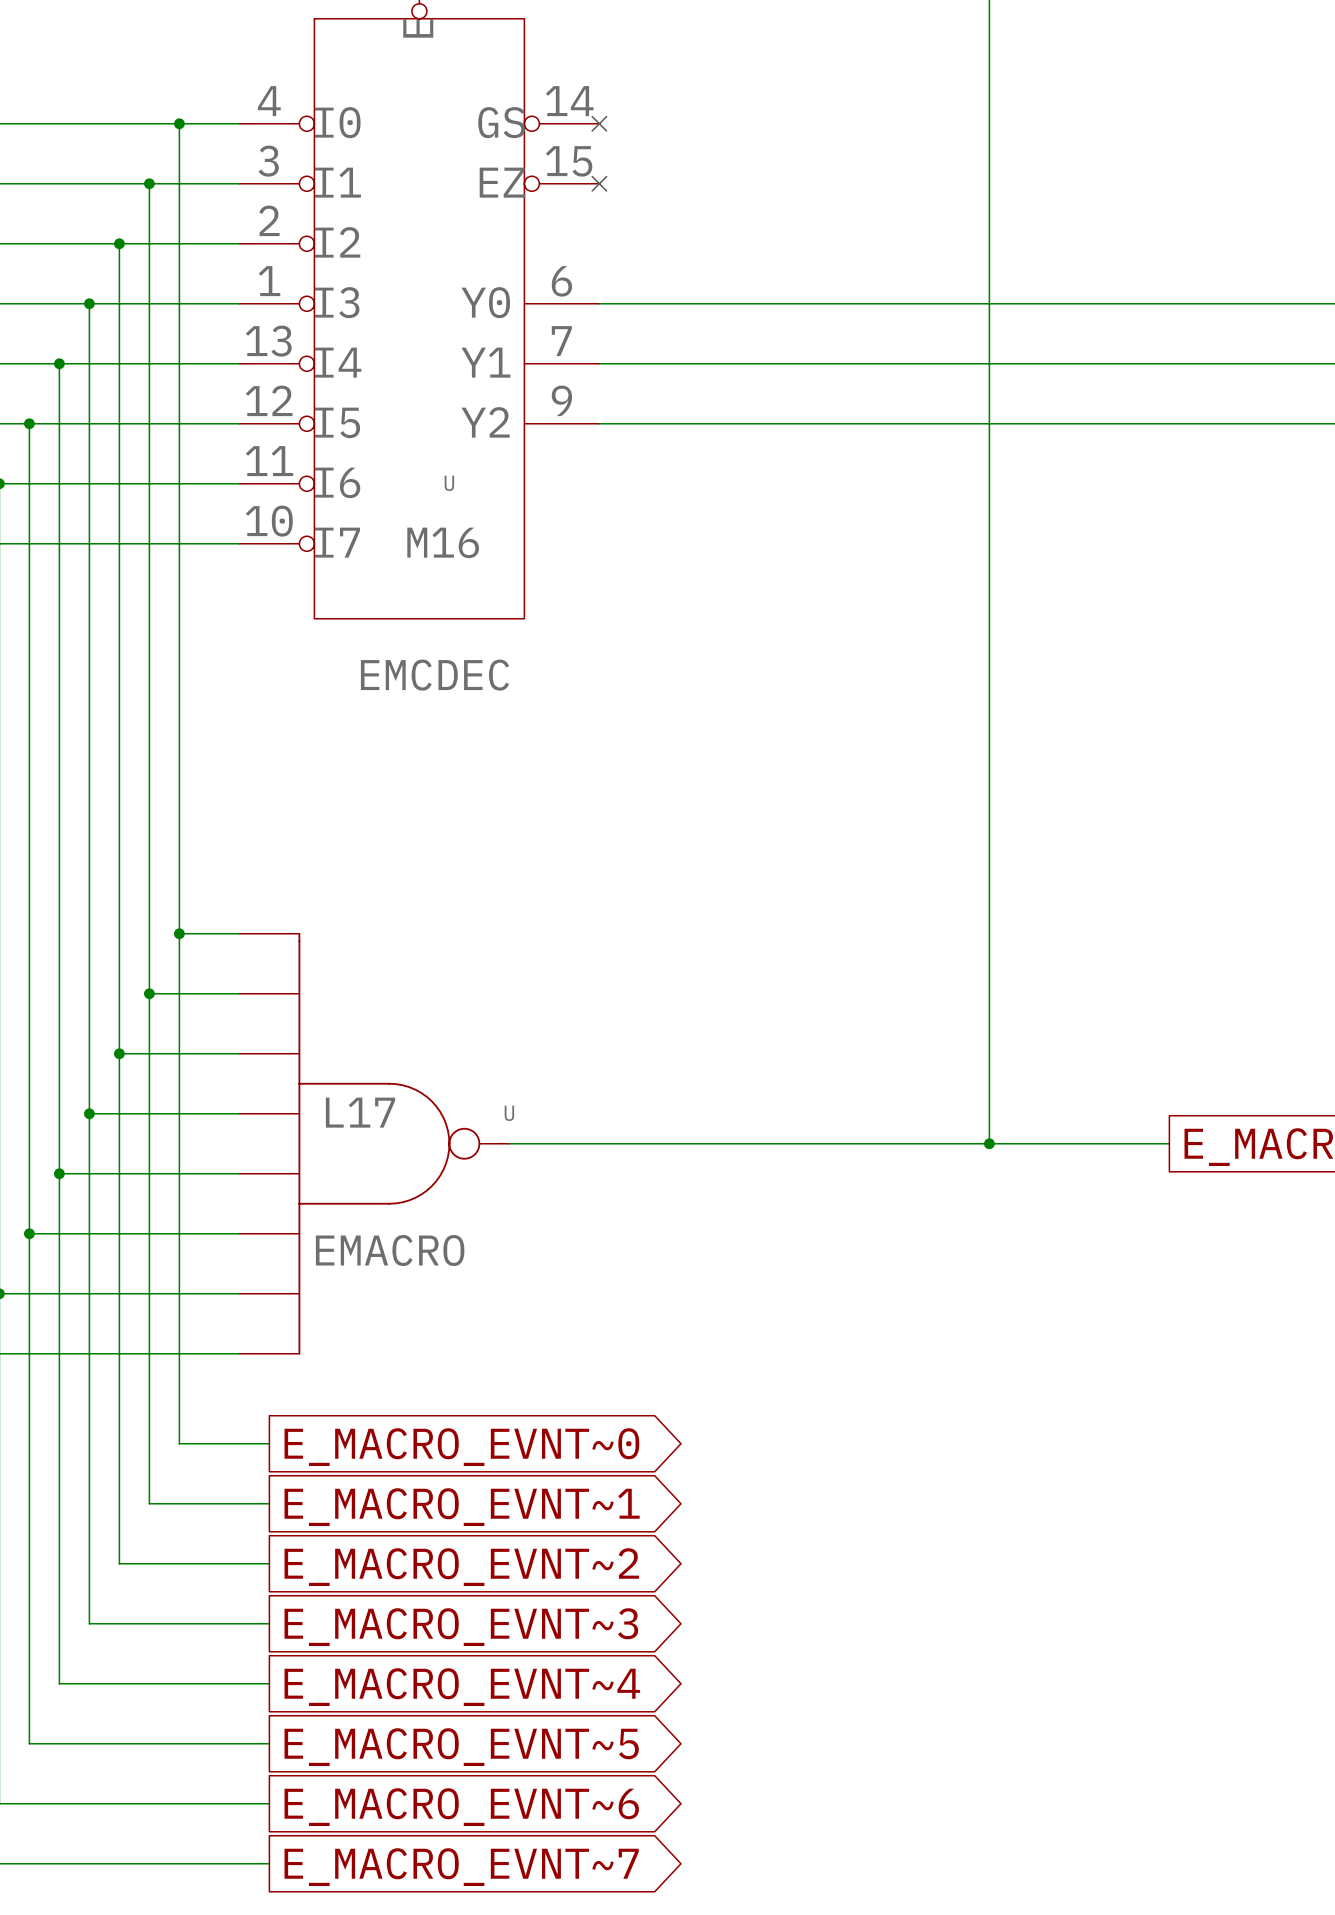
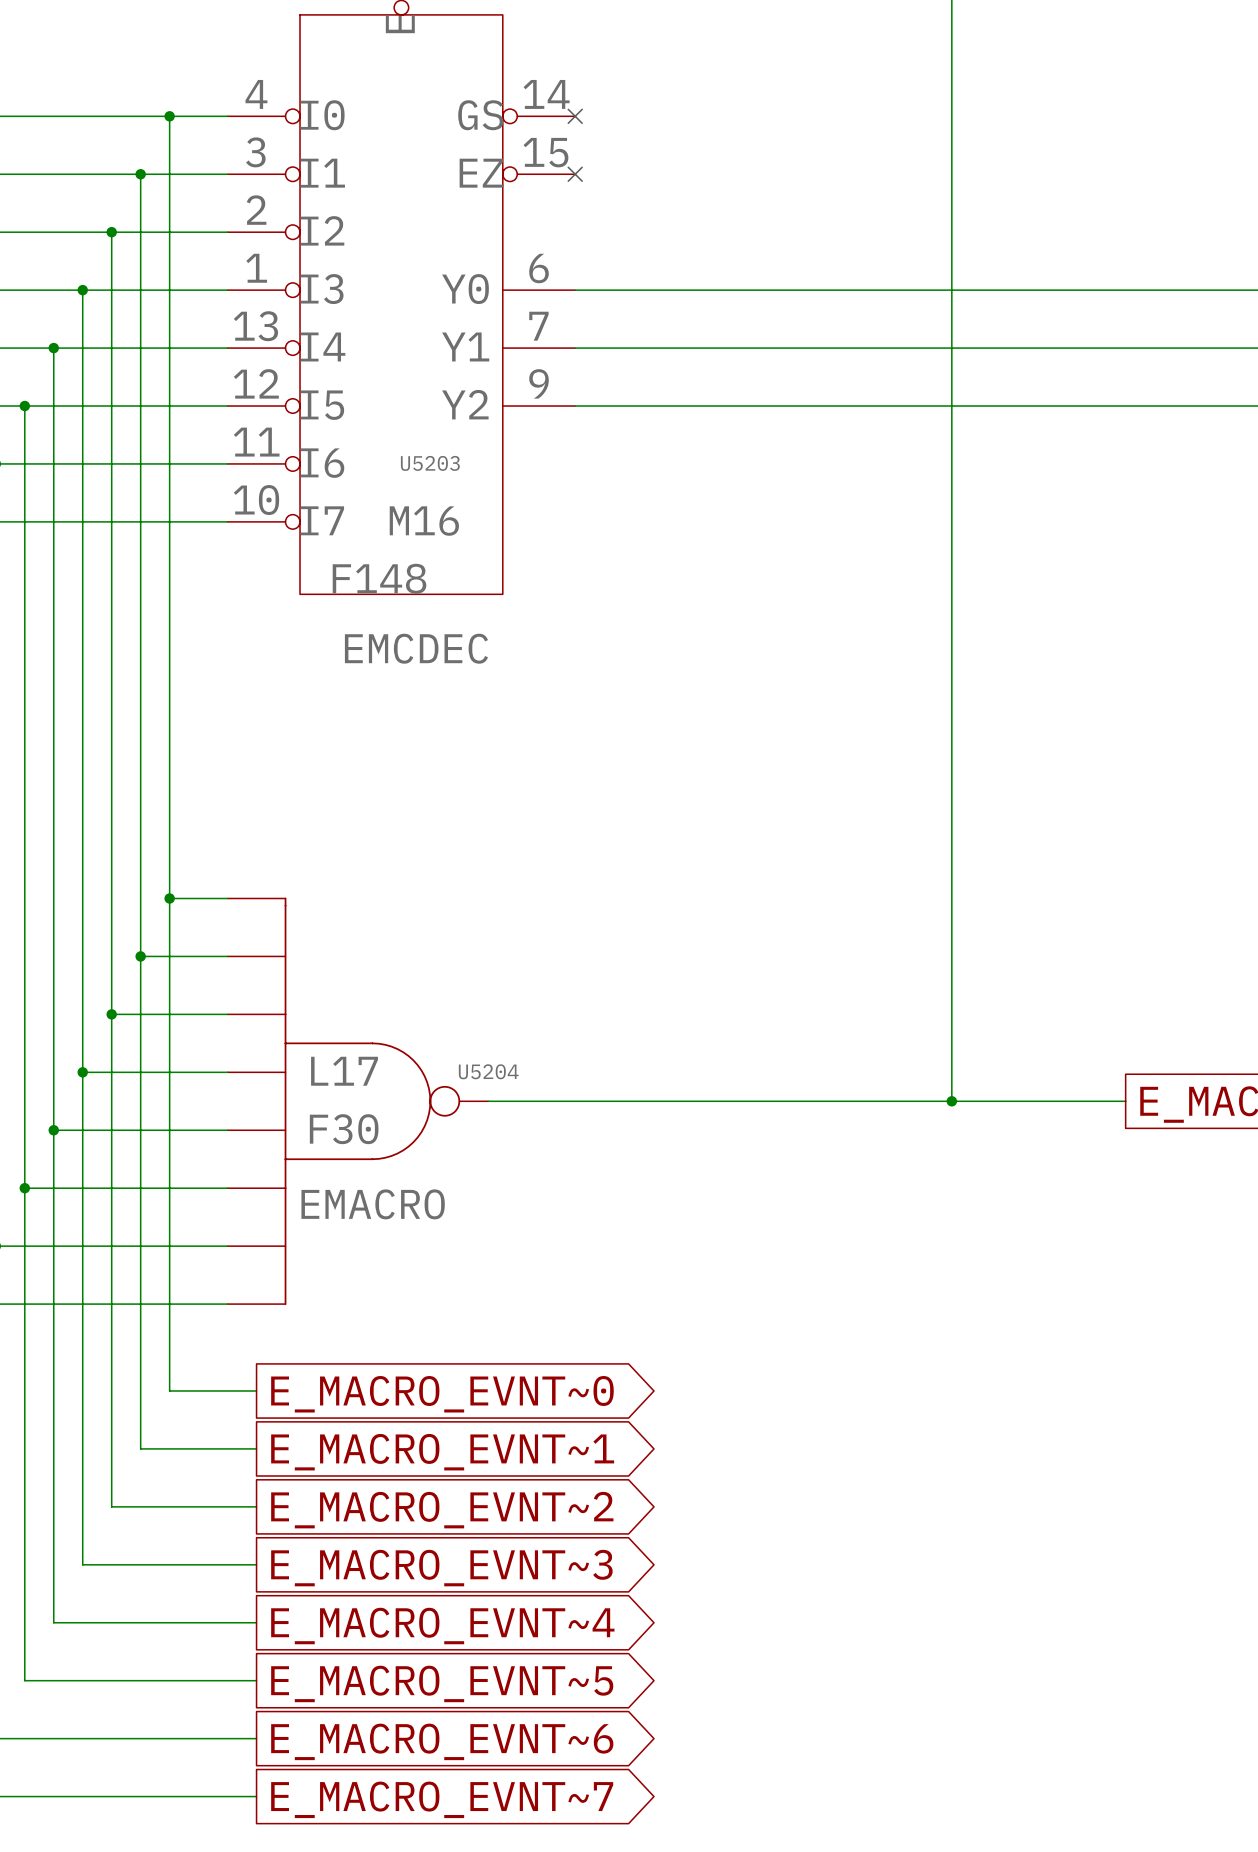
U name: U (449, 483) -> U5203 (430, 463)
U value: none -> F148 (379, 578)
U name: U (509, 1113) -> U5204 (488, 1071)
U value: none -> F30 (344, 1129)

